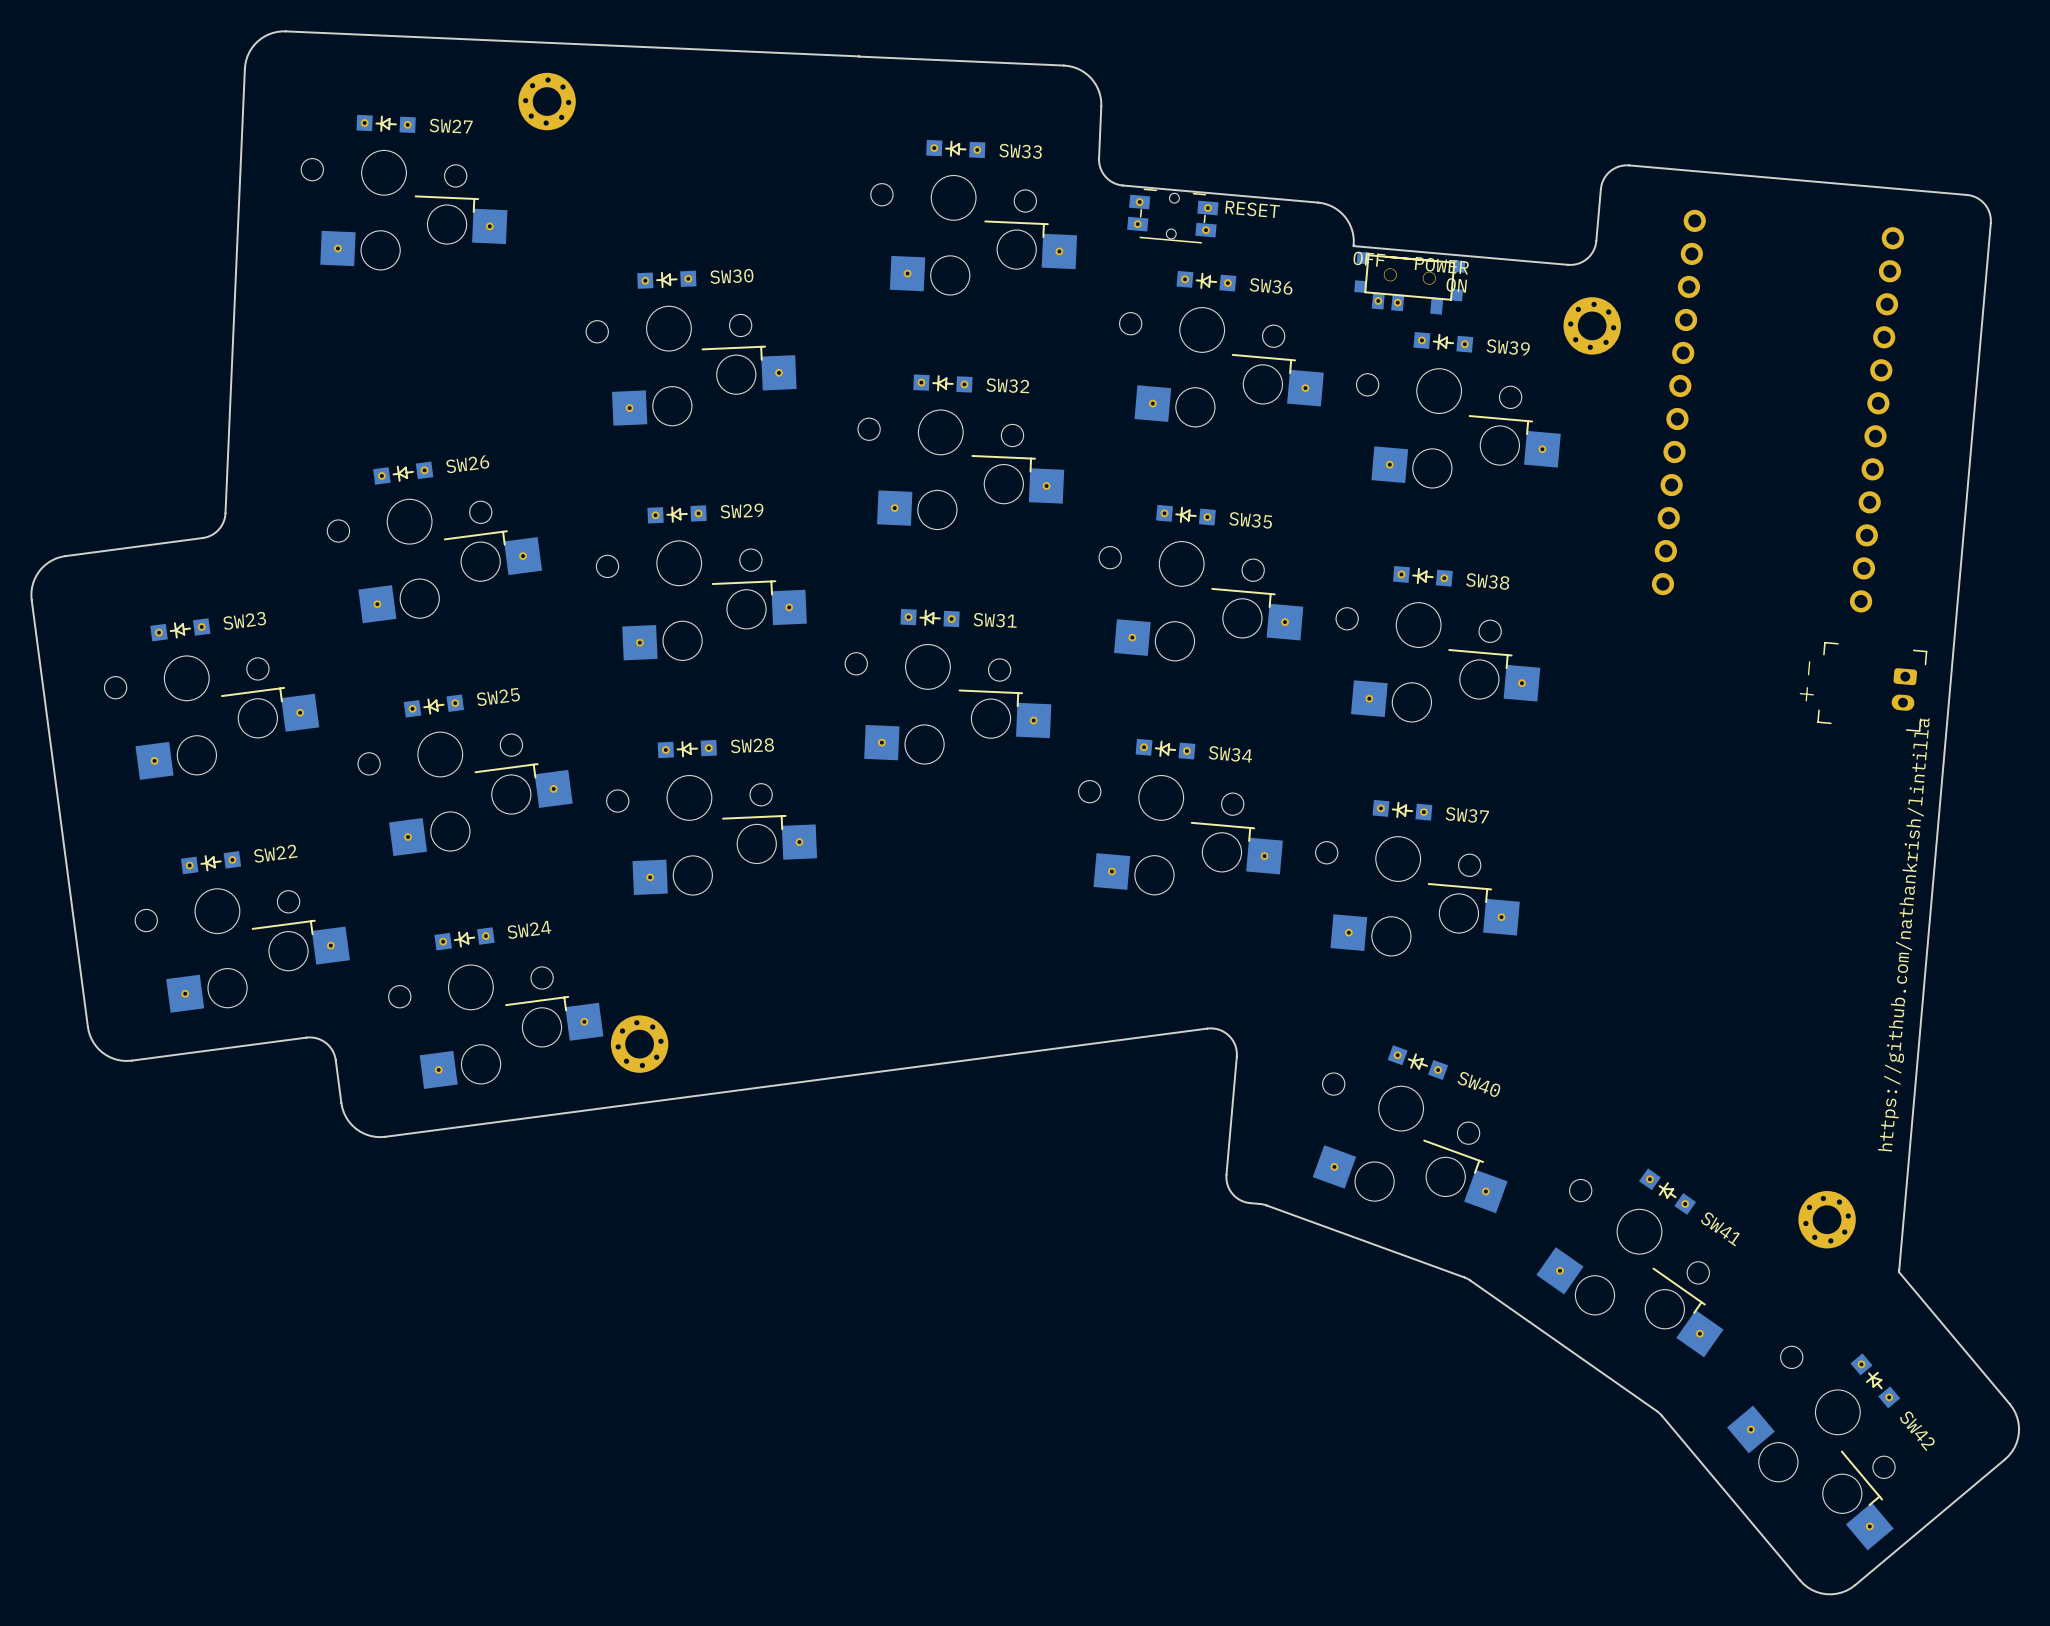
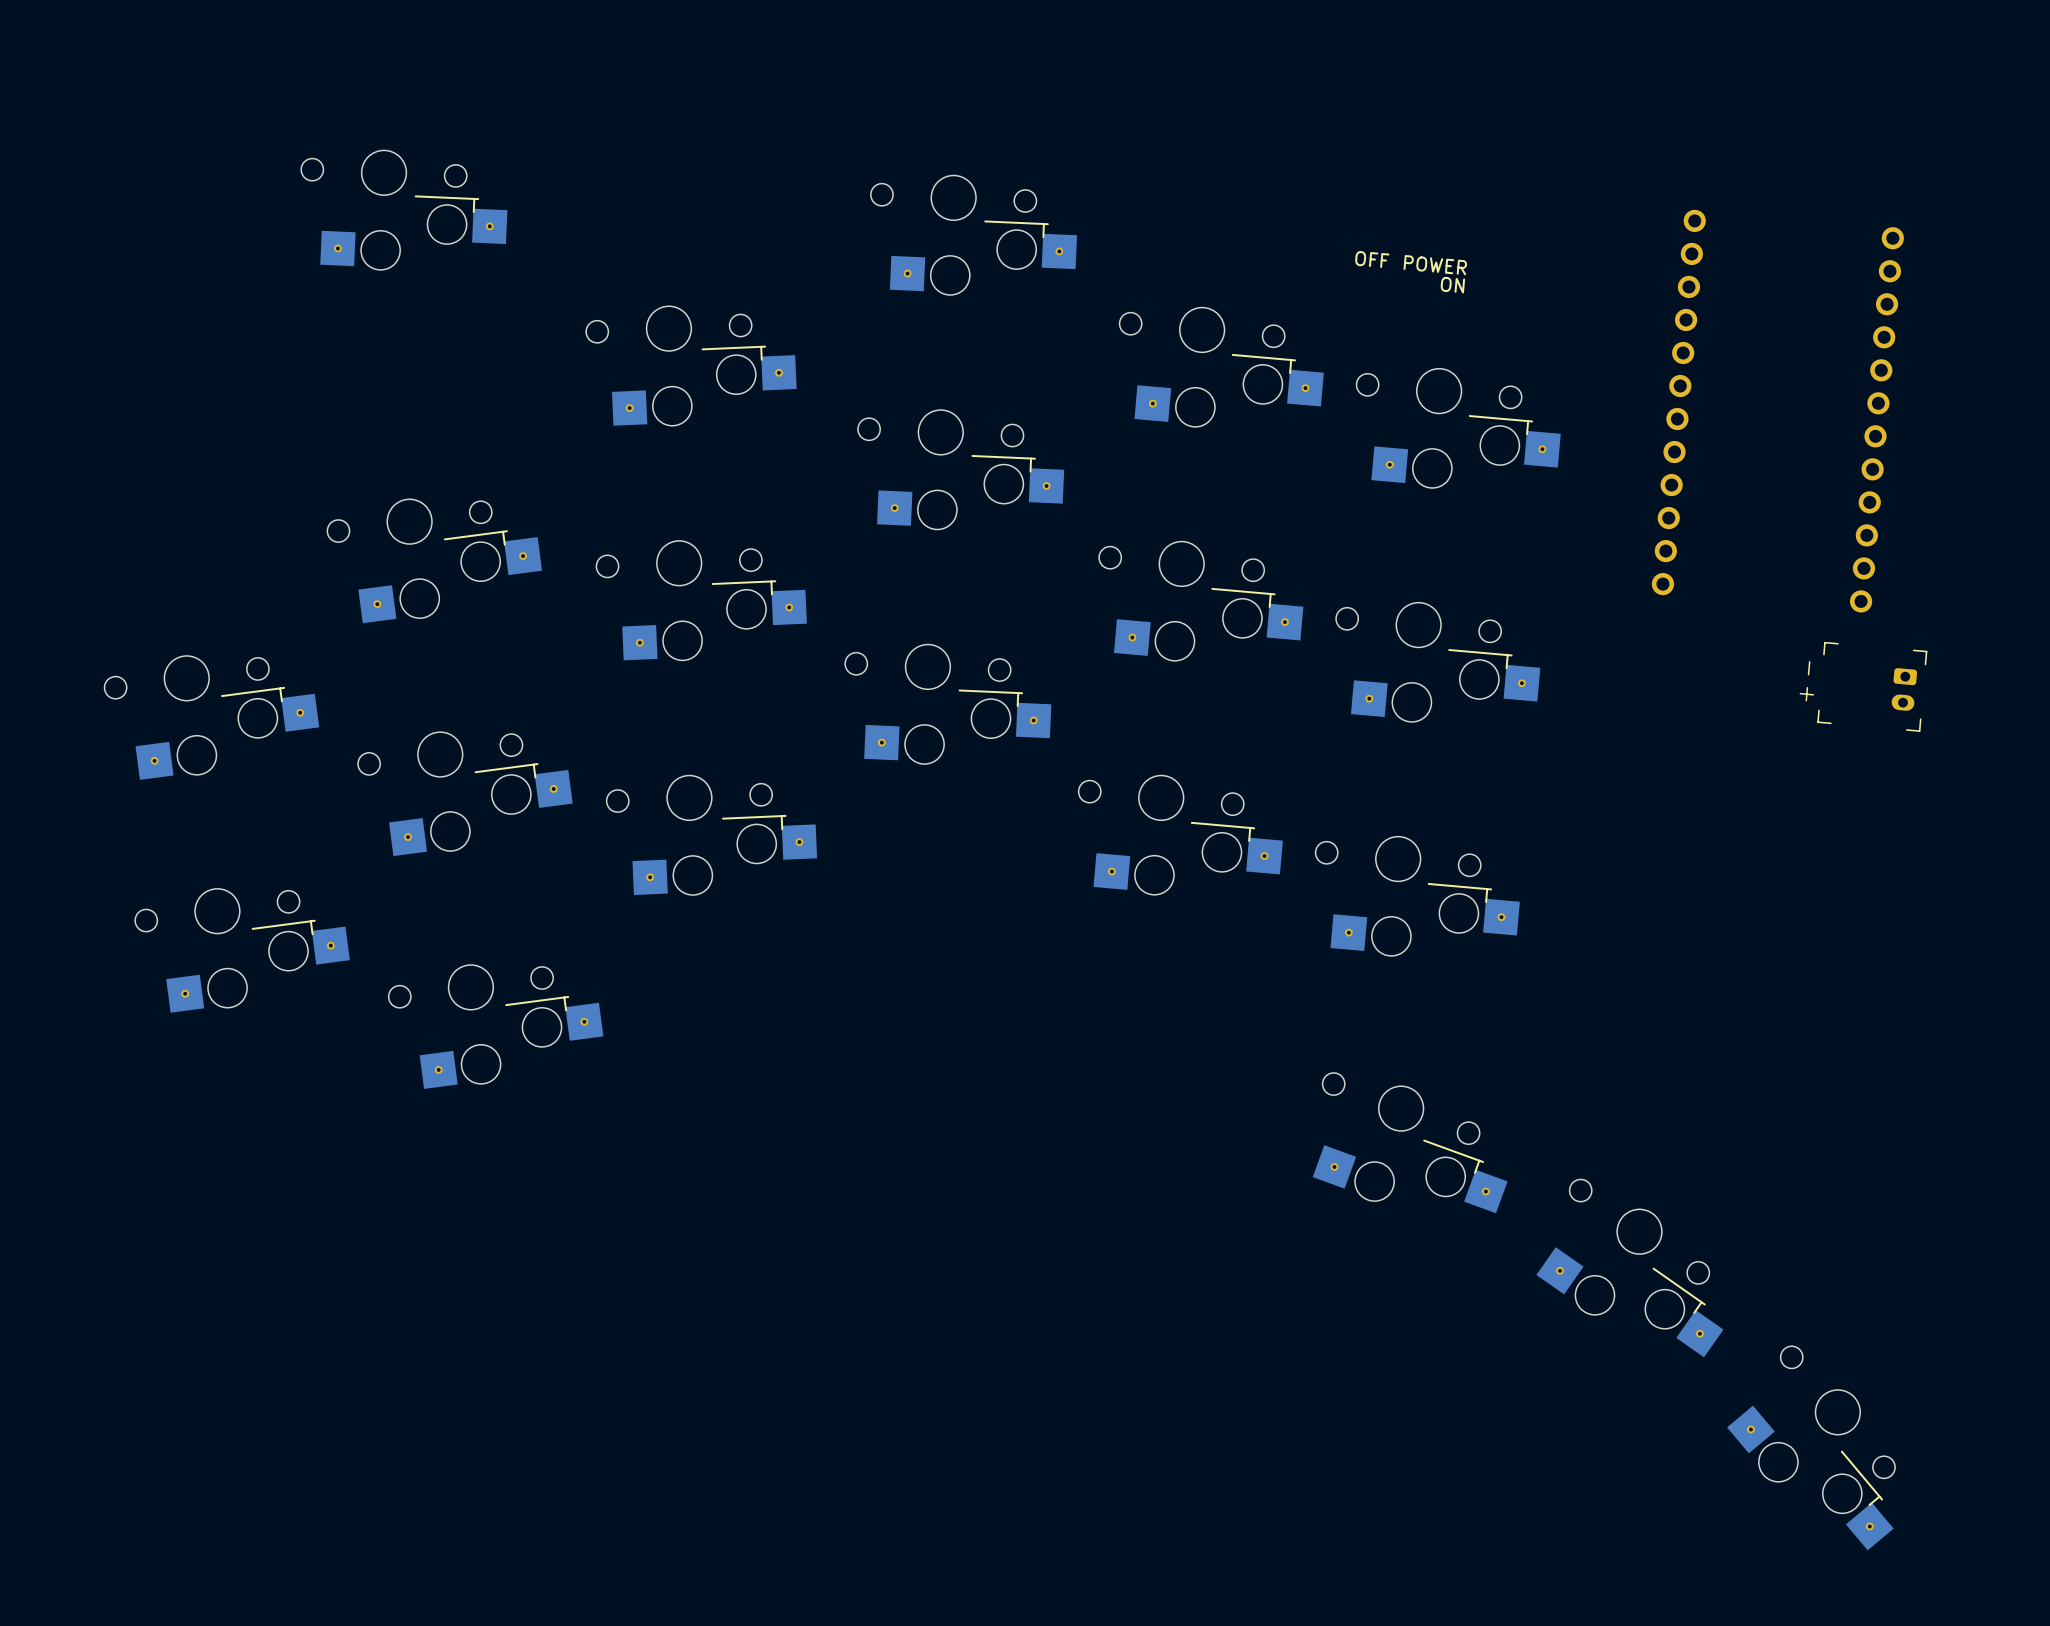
board edge: (859, 56) (285, 31) (264, 36) (251, 48) (244, 68) (225, 513) (223, 522) (216, 531) (205, 537) (56, 558) (39, 571) (32, 586) (31, 600) (87, 1026) (93, 1043) (110, 1057) (127, 1060) (306, 1037) (318, 1038) (327, 1044) (334, 1054) (341, 1103) (346, 1117) (360, 1131) (380, 1137) (1207, 1028) (1217, 1029) (1231, 1038) (1236, 1053) (1226, 1177) (1228, 1186) (1234, 1196) (1244, 1201) (1266, 1205) (1468, 1279) (1659, 1413) (1803, 1584) (1811, 1589) (1826, 1594) (1841, 1592) (1851, 1588) (2005, 1459) (2014, 1447) (2018, 1432) (2017, 1417) (2009, 1404) (1898, 1271) (1990, 223) (1986, 206) (1979, 199) (1967, 194) (1625, 165) (1612, 169) (1603, 179) (1600, 189) (1595, 246) (1589, 256) (1576, 264) (1353, 246) (1352, 231) (1347, 219) (1338, 210) (1326, 204) (1122, 185) (1110, 181) (1103, 174) (1099, 161) (1101, 106) (1099, 93) (1091, 78) (1076, 68) (1063, 65) (859, 56) -> none
part: (547, 101) -> none
part: (386, 123) -> none
part: (955, 148) -> none
text: RESET (1252, 209) -> none
part: (1172, 216) -> none
part: (666, 279) -> none
part: (1206, 281) -> none
part: (1409, 283) -> none
part: (1592, 325) -> none
part: (1443, 342) -> none
part: (942, 383) -> none
part: (403, 473) -> none
part: (677, 514) -> none
part: (1185, 515) -> none
part: (1422, 576) -> none
part: (930, 618) -> none
part: (180, 629) -> none
part: (433, 706) -> none
part: (687, 749) -> none
part: (1165, 749) -> none
part: (1402, 810) -> none
part: (211, 862) -> none
text: https://github.com/nathankrish/lintilla (1903, 934) -> none
part: (464, 938) -> none
part: (639, 1044) -> none
part: (1417, 1062) -> none
part: (1667, 1191) -> none
part: (1827, 1219) -> none
part: (1875, 1380) -> none

